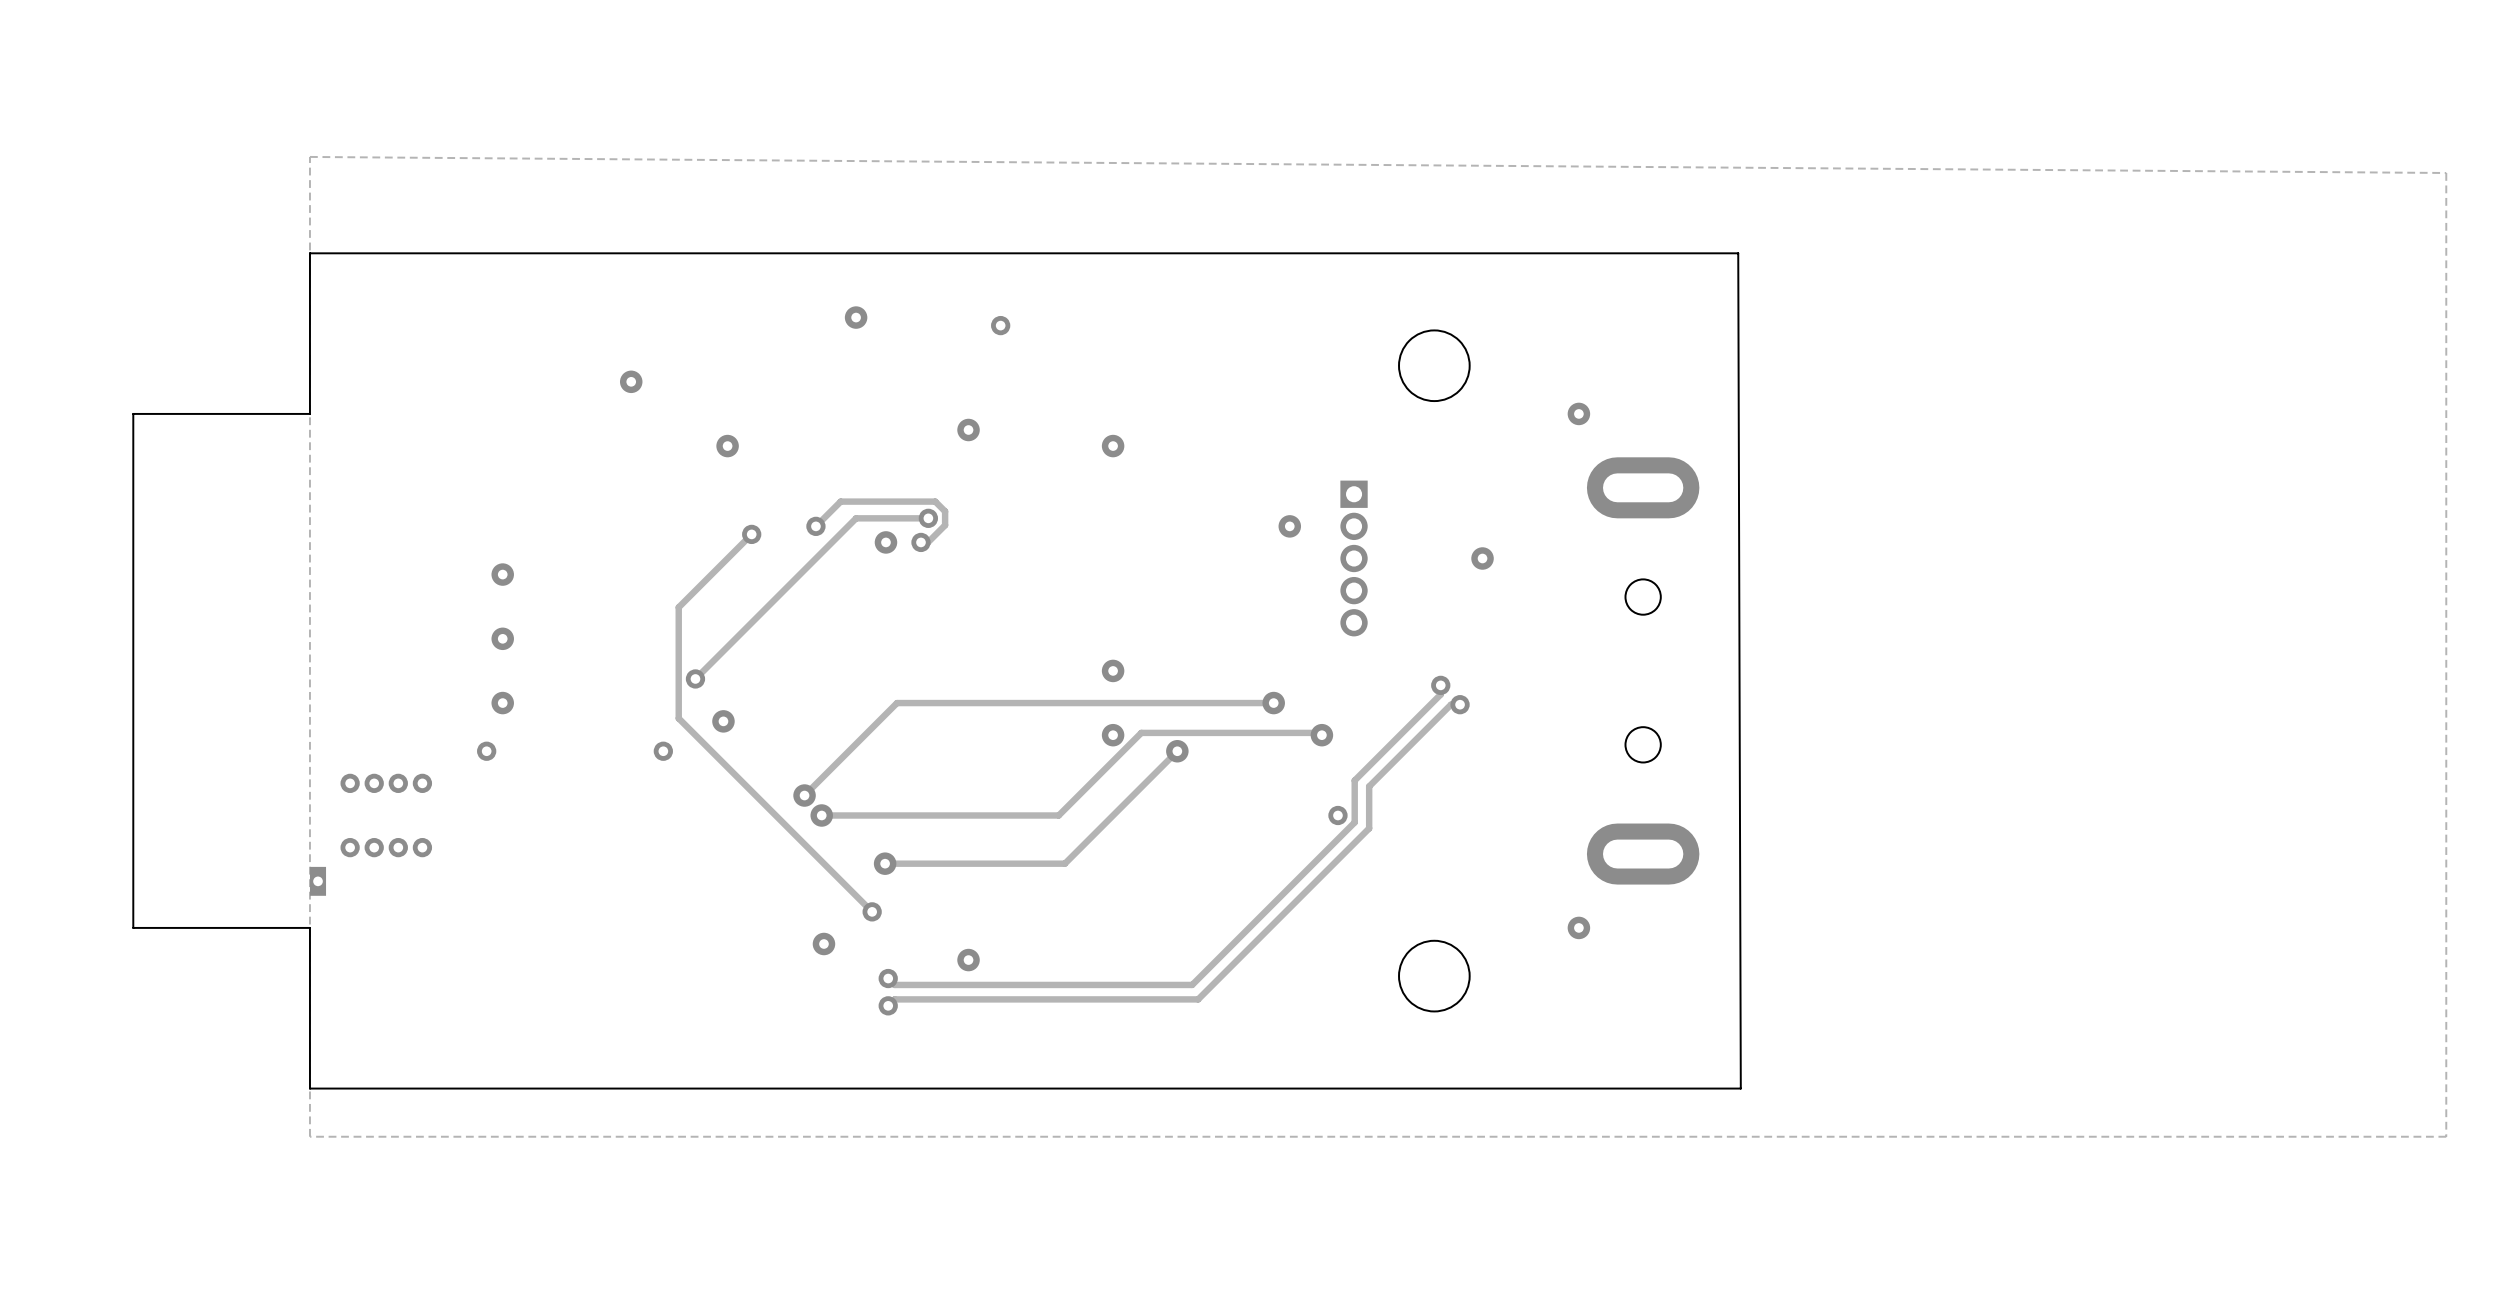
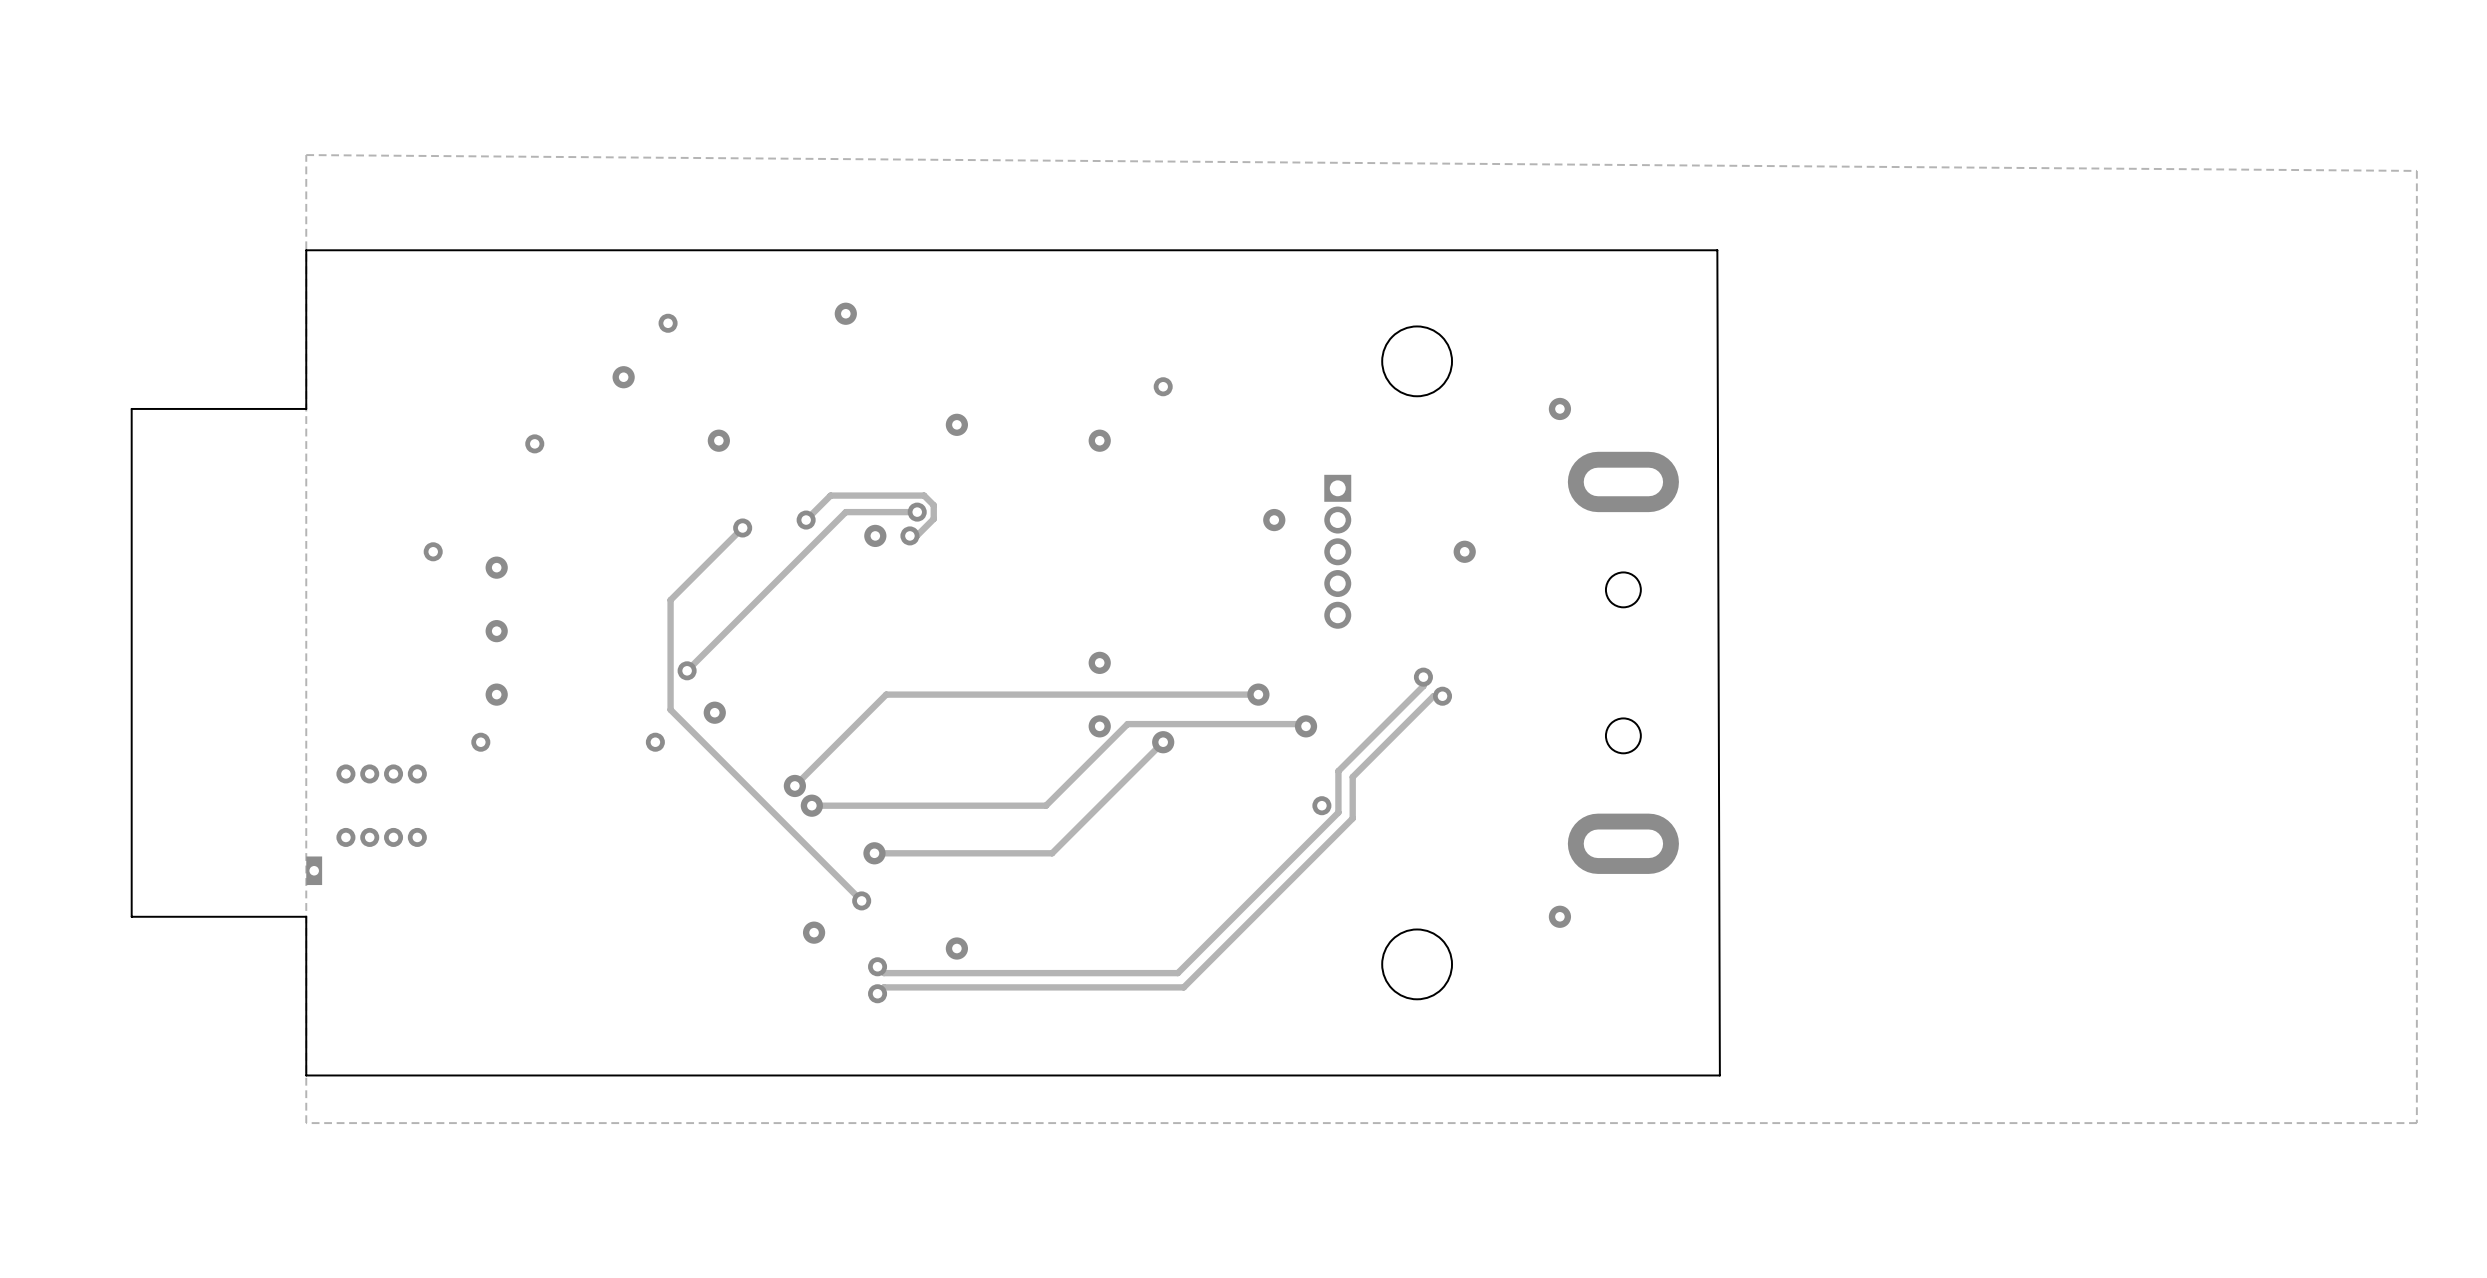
via: (1000, 325) -> none
via: none -> (668, 323)
via: none -> (1163, 386)
via: none -> (534, 443)
via: none -> (433, 551)

